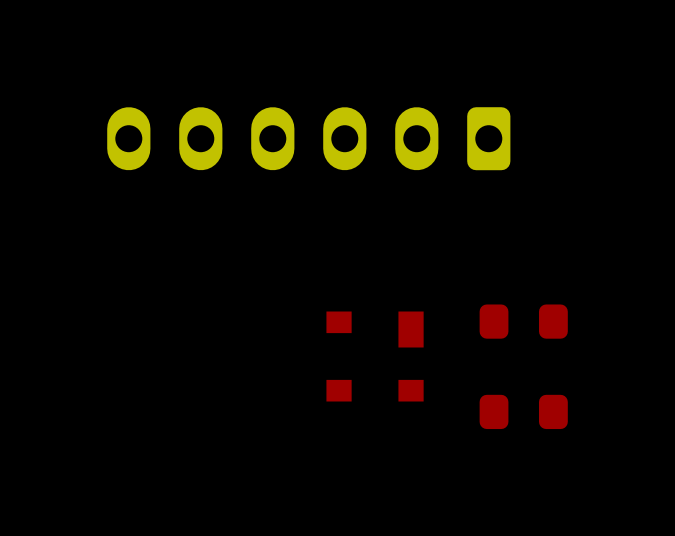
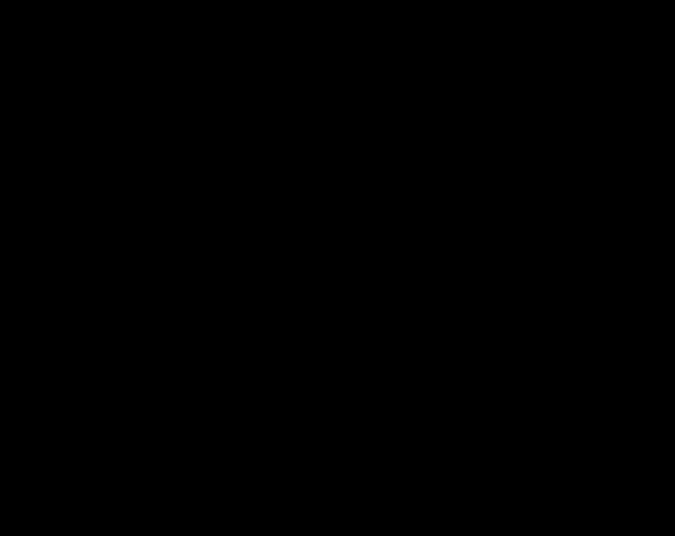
part: (308, 138) -> none
part: (523, 321) -> none
part: (375, 356) -> none
part: (523, 411) -> none

